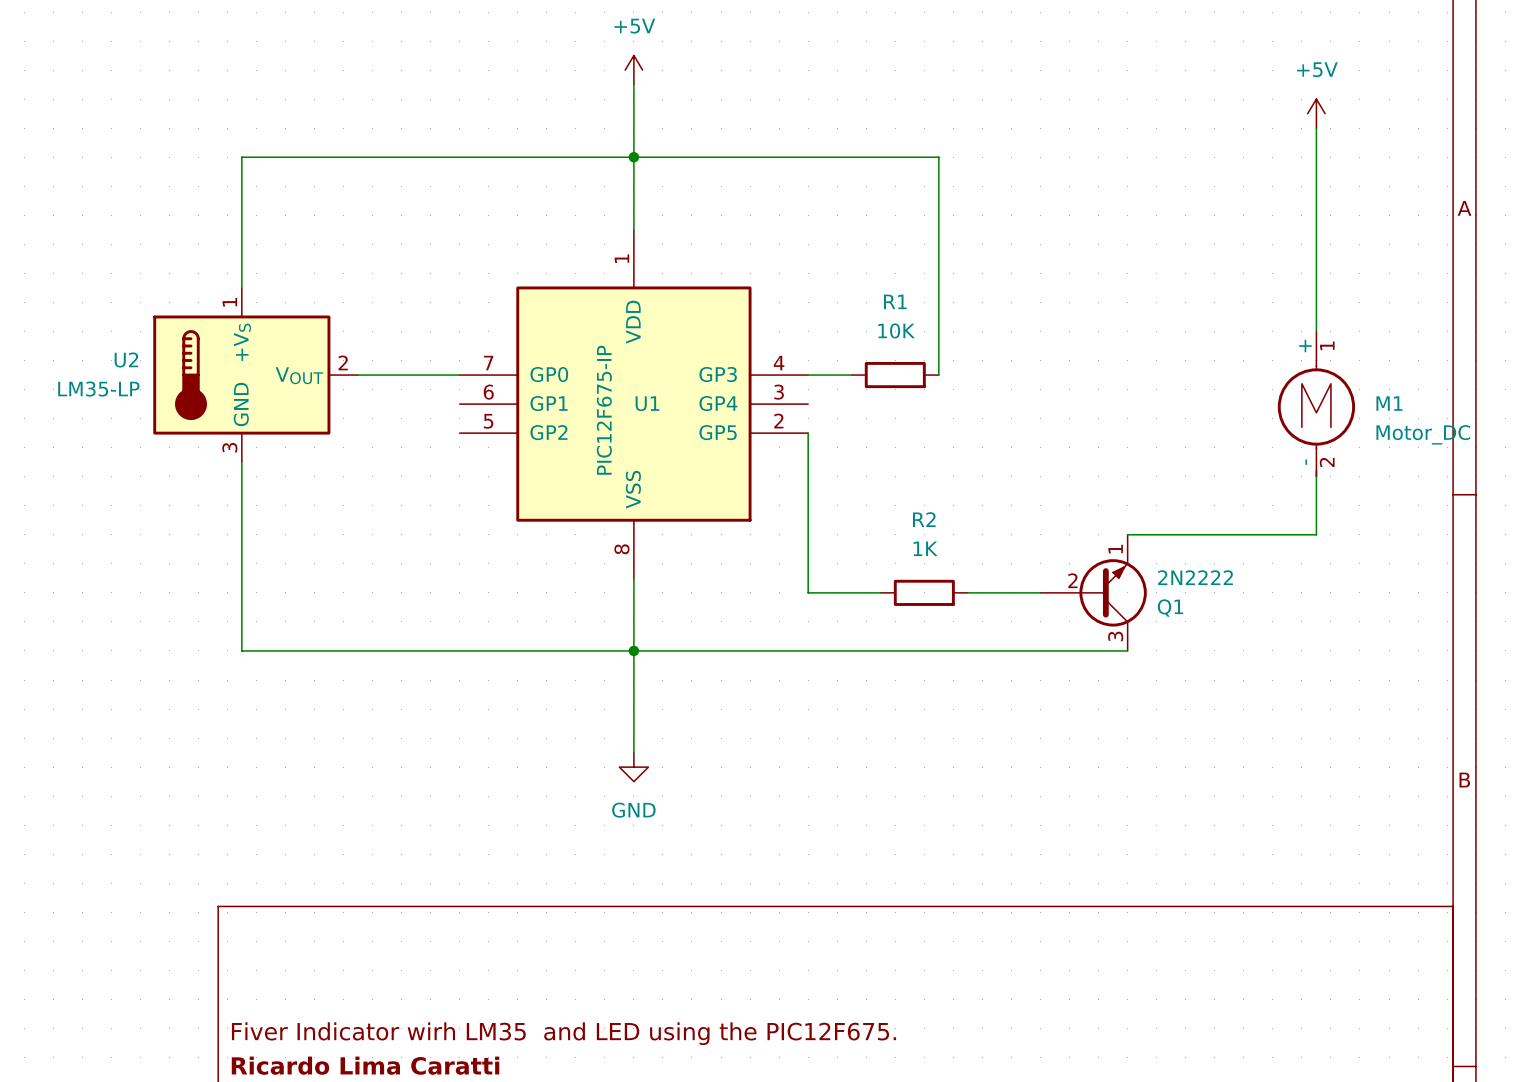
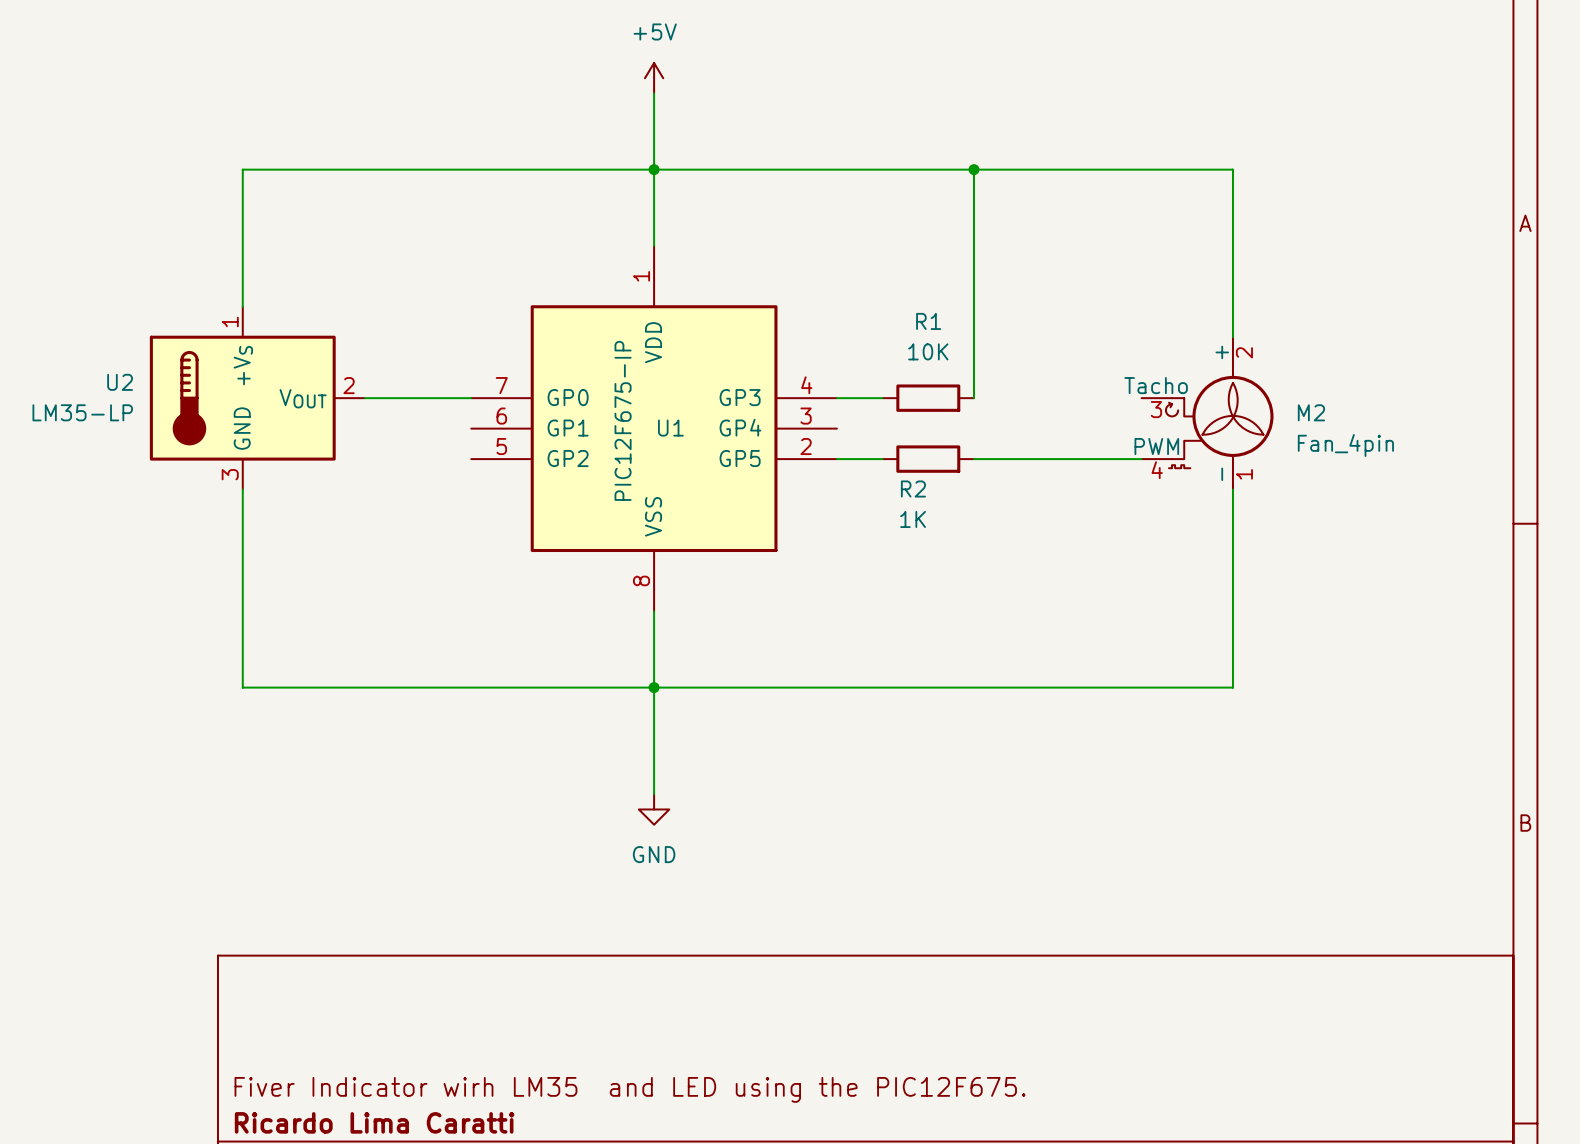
power symbol: +5V (1316, 113) -> none
wire: (1316, 128) (1316, 331) -> none
wire: none -> (974, 169) (1232, 169) (1232, 337)
junction: none -> (974, 169)
M2: none -> Fan_4pin (1207, 413)
M1: Motor_DC (1316, 404) -> none
wire: (808, 433) (808, 592) (880, 592) -> (836, 459) (882, 459)
wire: none -> (974, 459) (1141, 459)
wire: none -> (1232, 489) (1232, 687) (1172, 687)
wire: (1316, 476) (1316, 534) (1127, 534) -> none
R2 name position: R2 (924, 519) -> R2 (913, 488)
R2 value position: 1K (925, 548) -> 1K (913, 519)
R2 position: (924, 592) -> (928, 459)
wire: (967, 592) (1040, 592) -> none
Q1: 2N2222 (1093, 592) -> none

